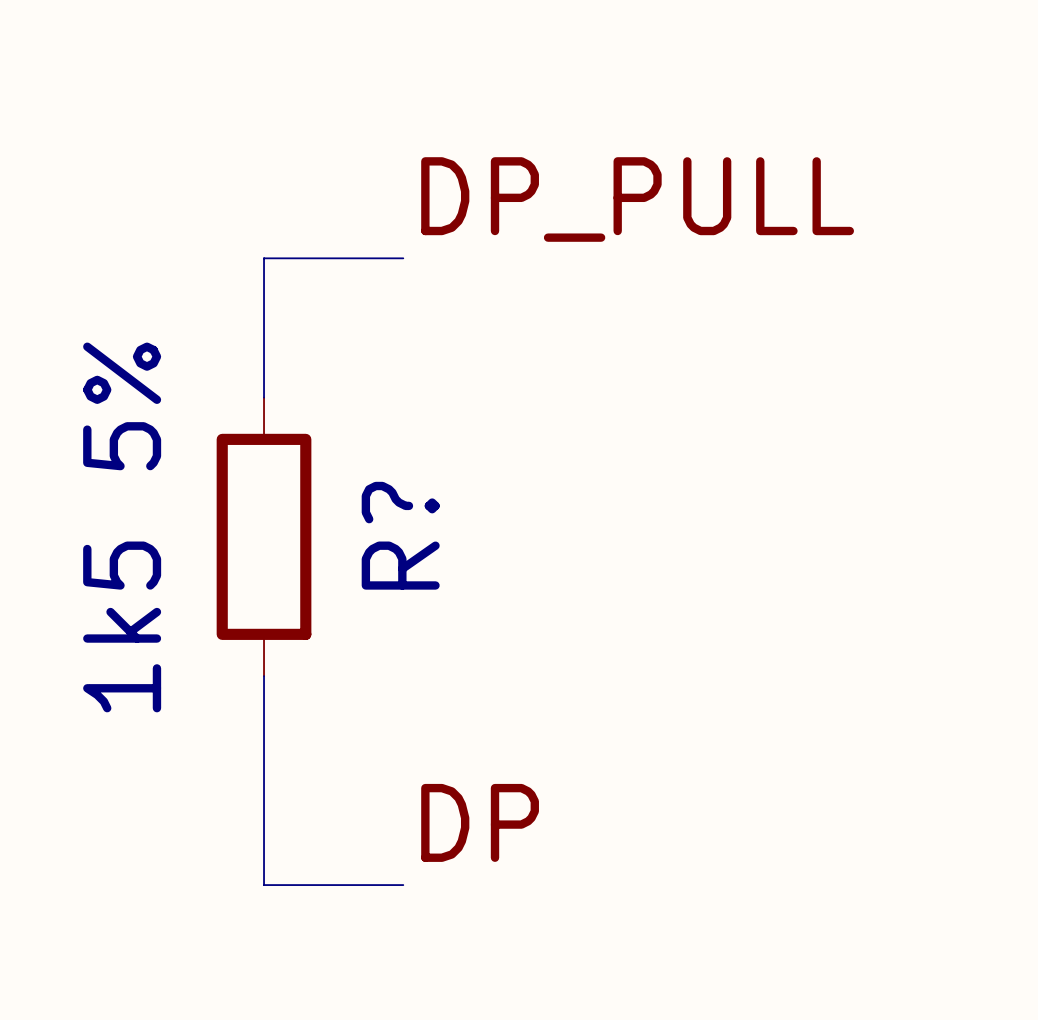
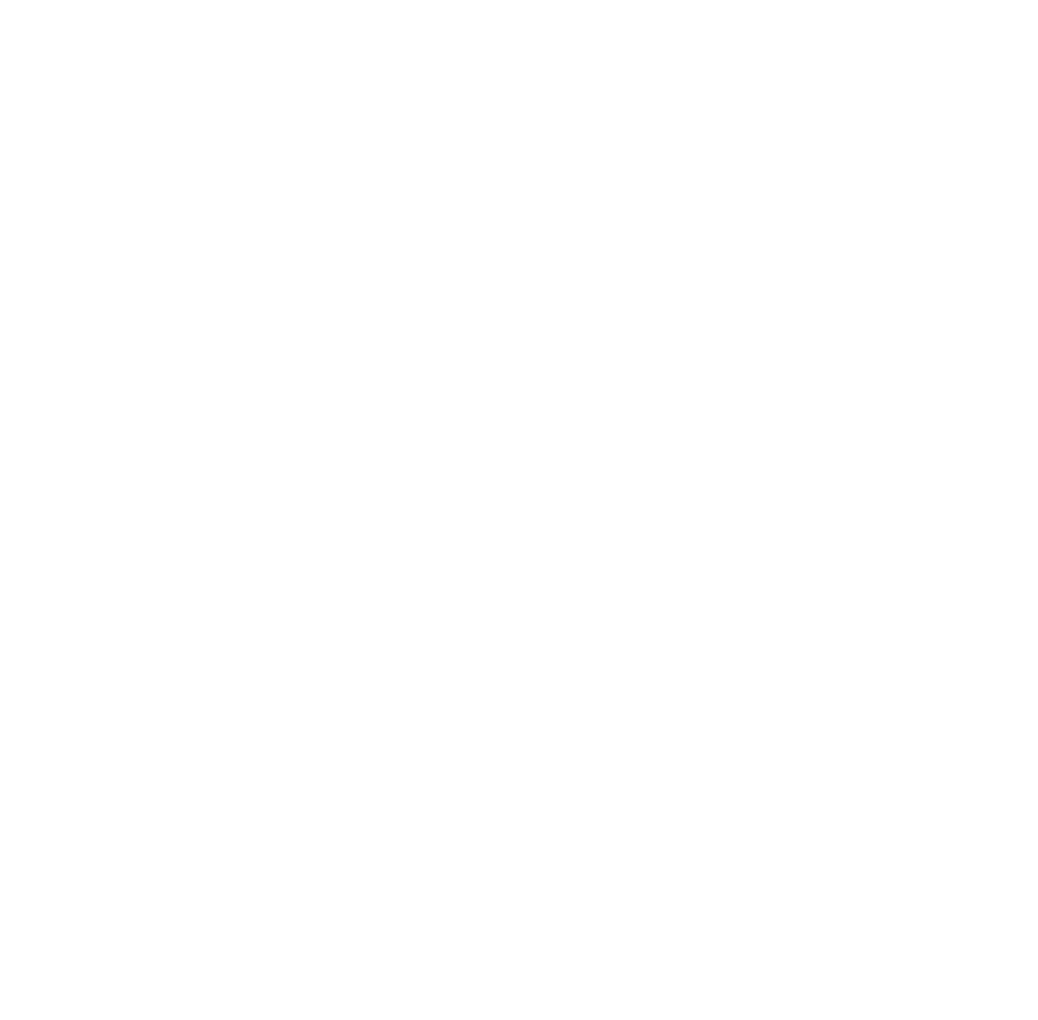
label: DP_PULL (637, 199) -> none
wire: (403, 258) (264, 258) (264, 397) -> none
R?: 1k5 5% (264, 536) -> none
wire: (264, 676) (264, 885) (403, 885) -> none
label: DP (480, 822) -> none

